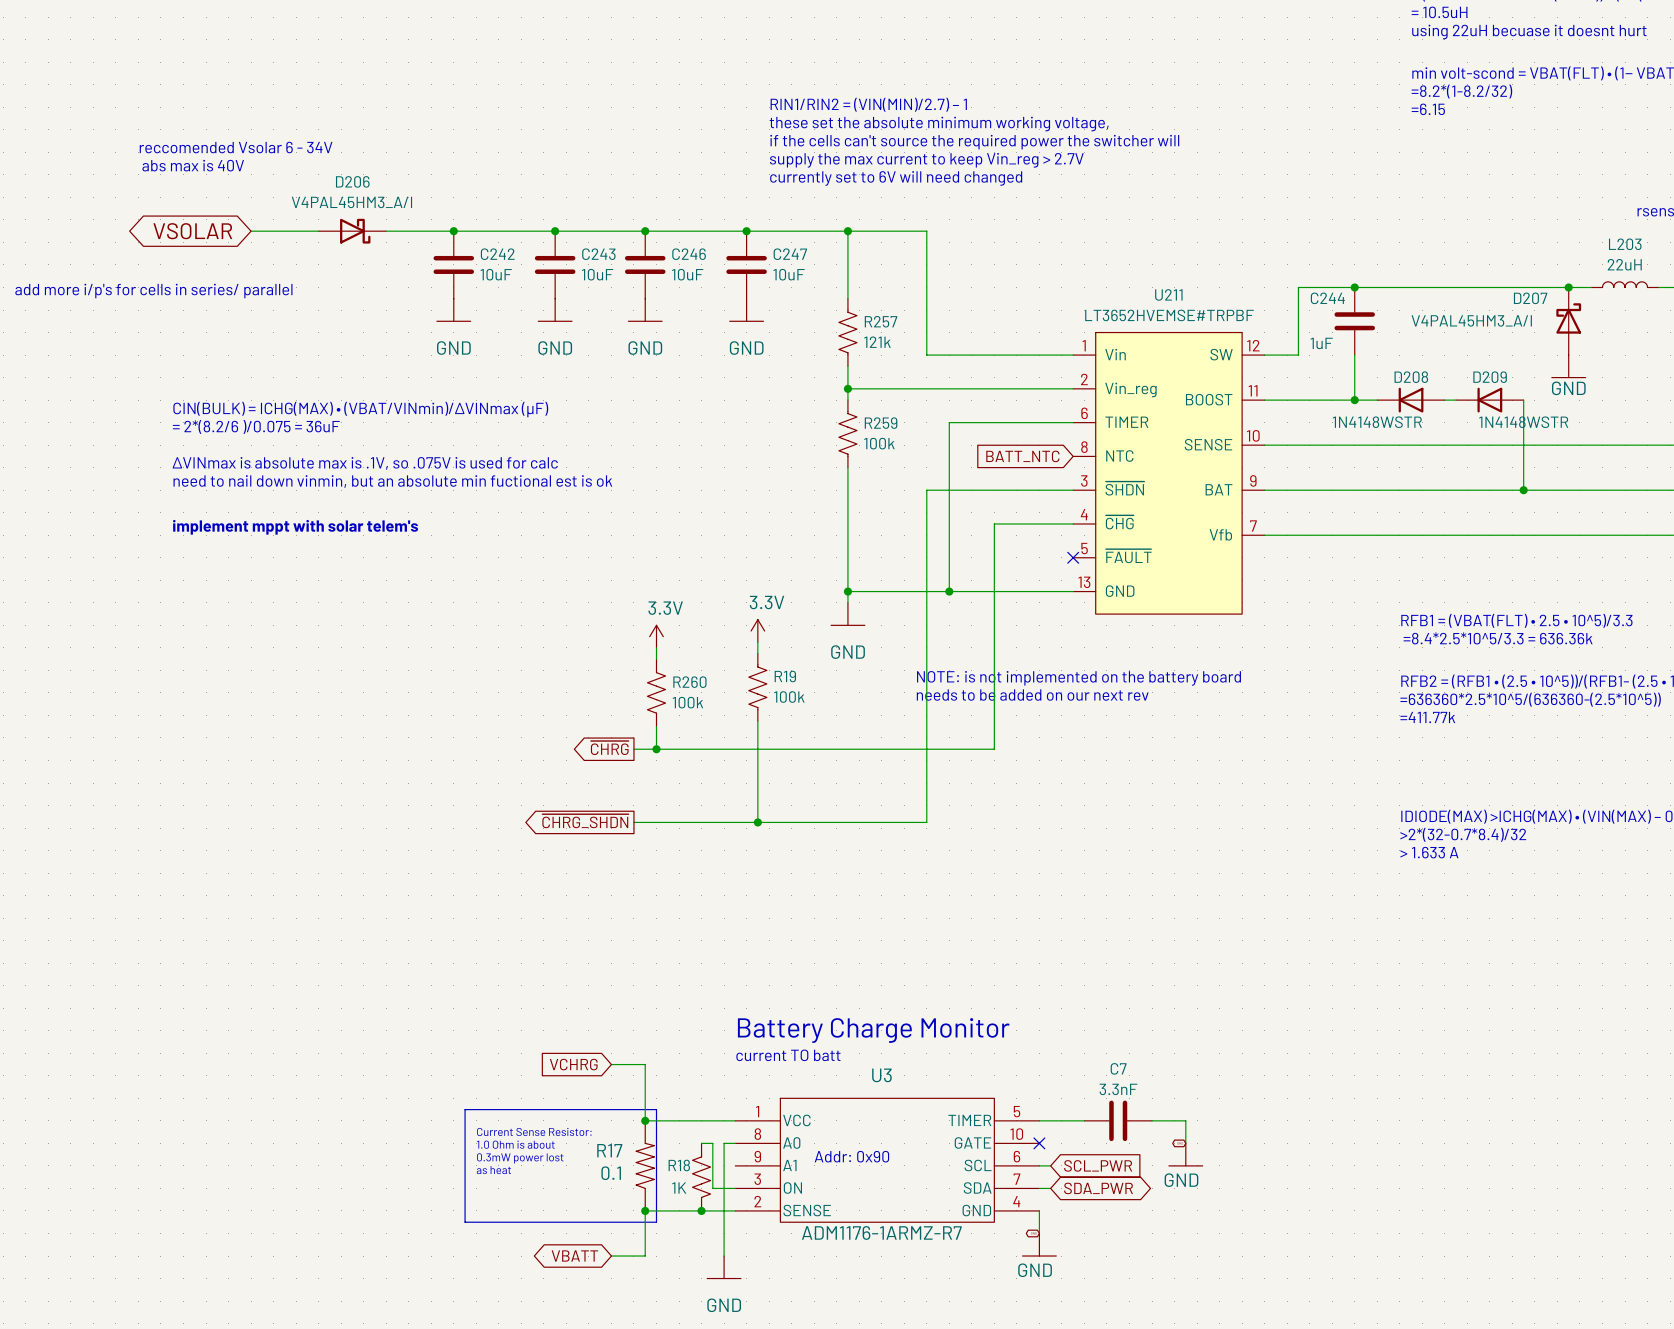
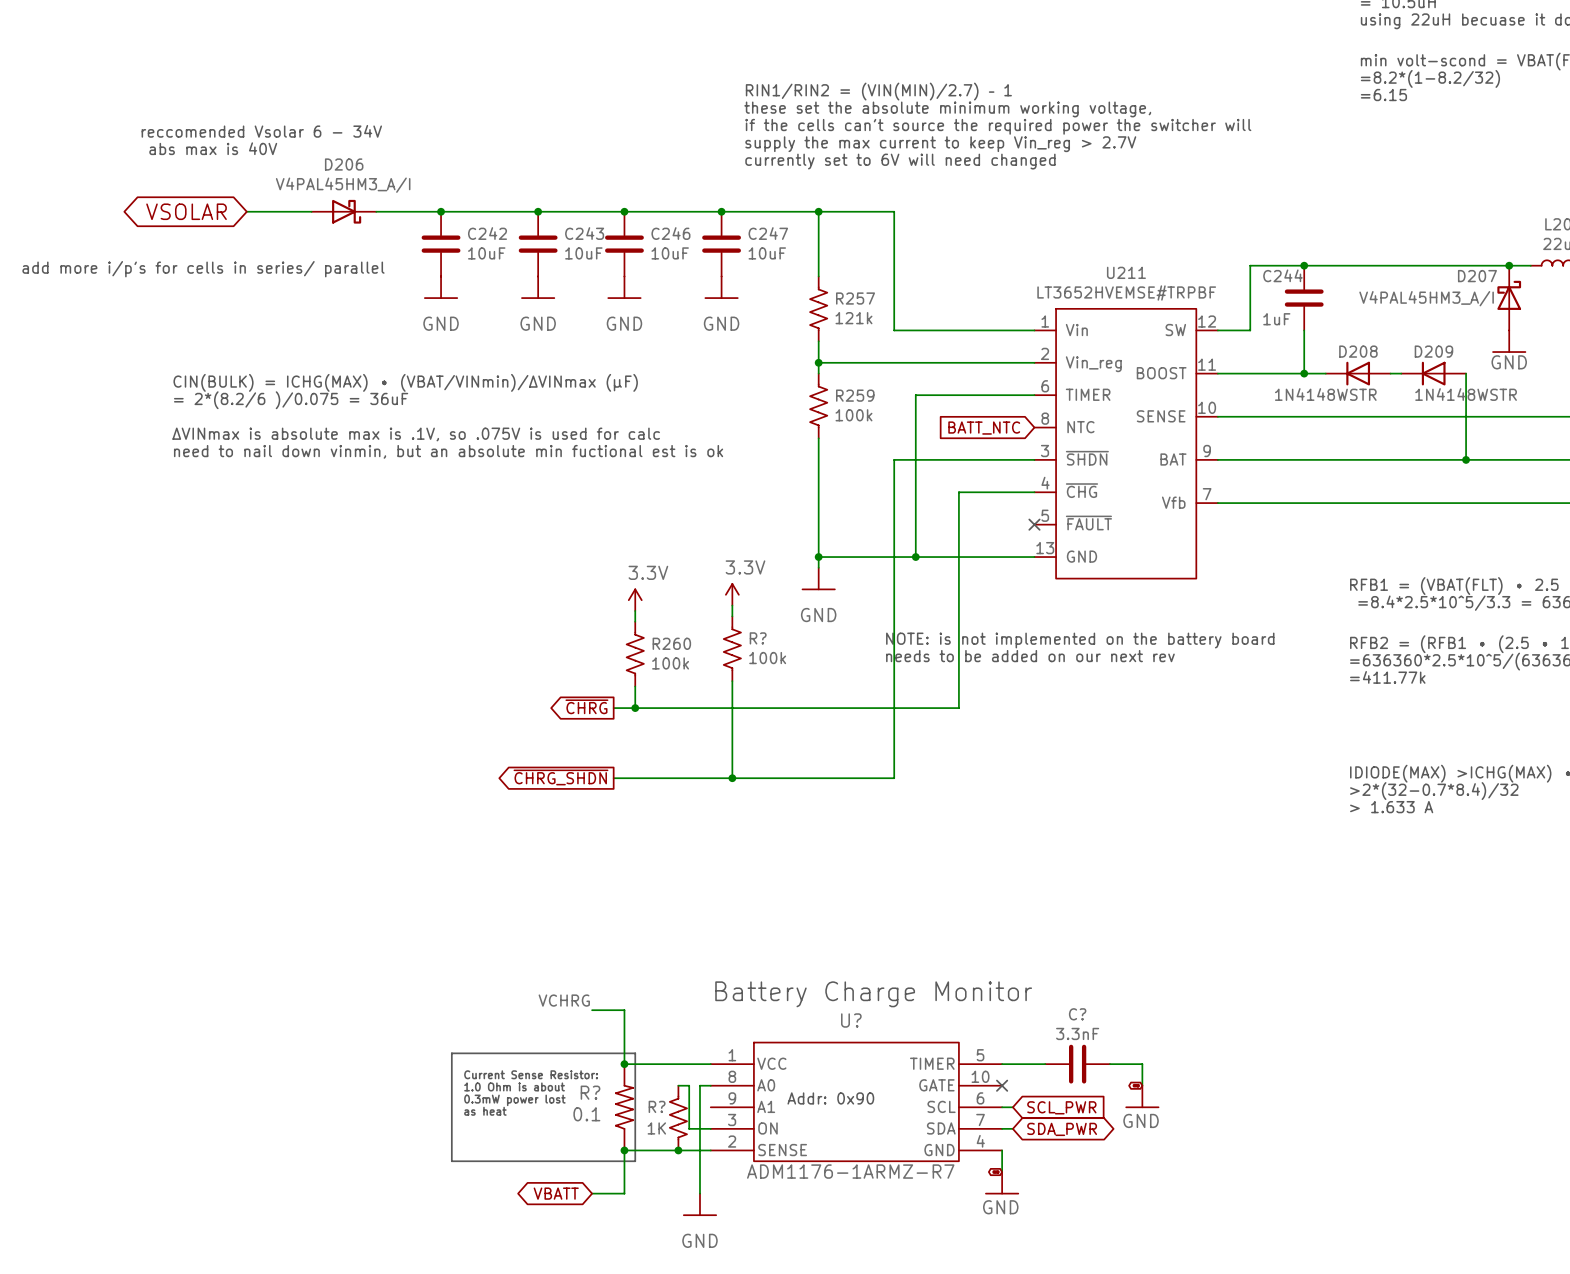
text: implement mppt with solar telem's (295, 527) -> none
R19 name: R19 (785, 676) -> R? (758, 638)
text: Battery Charge Monitor (873, 1030) -> none
label: none -> VCHRG (564, 1000)
text: current TO batt (788, 1055) -> Battery Charge Monitor (873, 994)
global label: VCHRG (573, 1064) -> none
C7 name: C7 (1118, 1068) -> C? (1077, 1014)
U3 name: U3 (881, 1075) -> U? (851, 1020)
R17 name: R17 (609, 1150) -> R? (590, 1092)
R18 name: R18 (679, 1165) -> R? (657, 1106)

